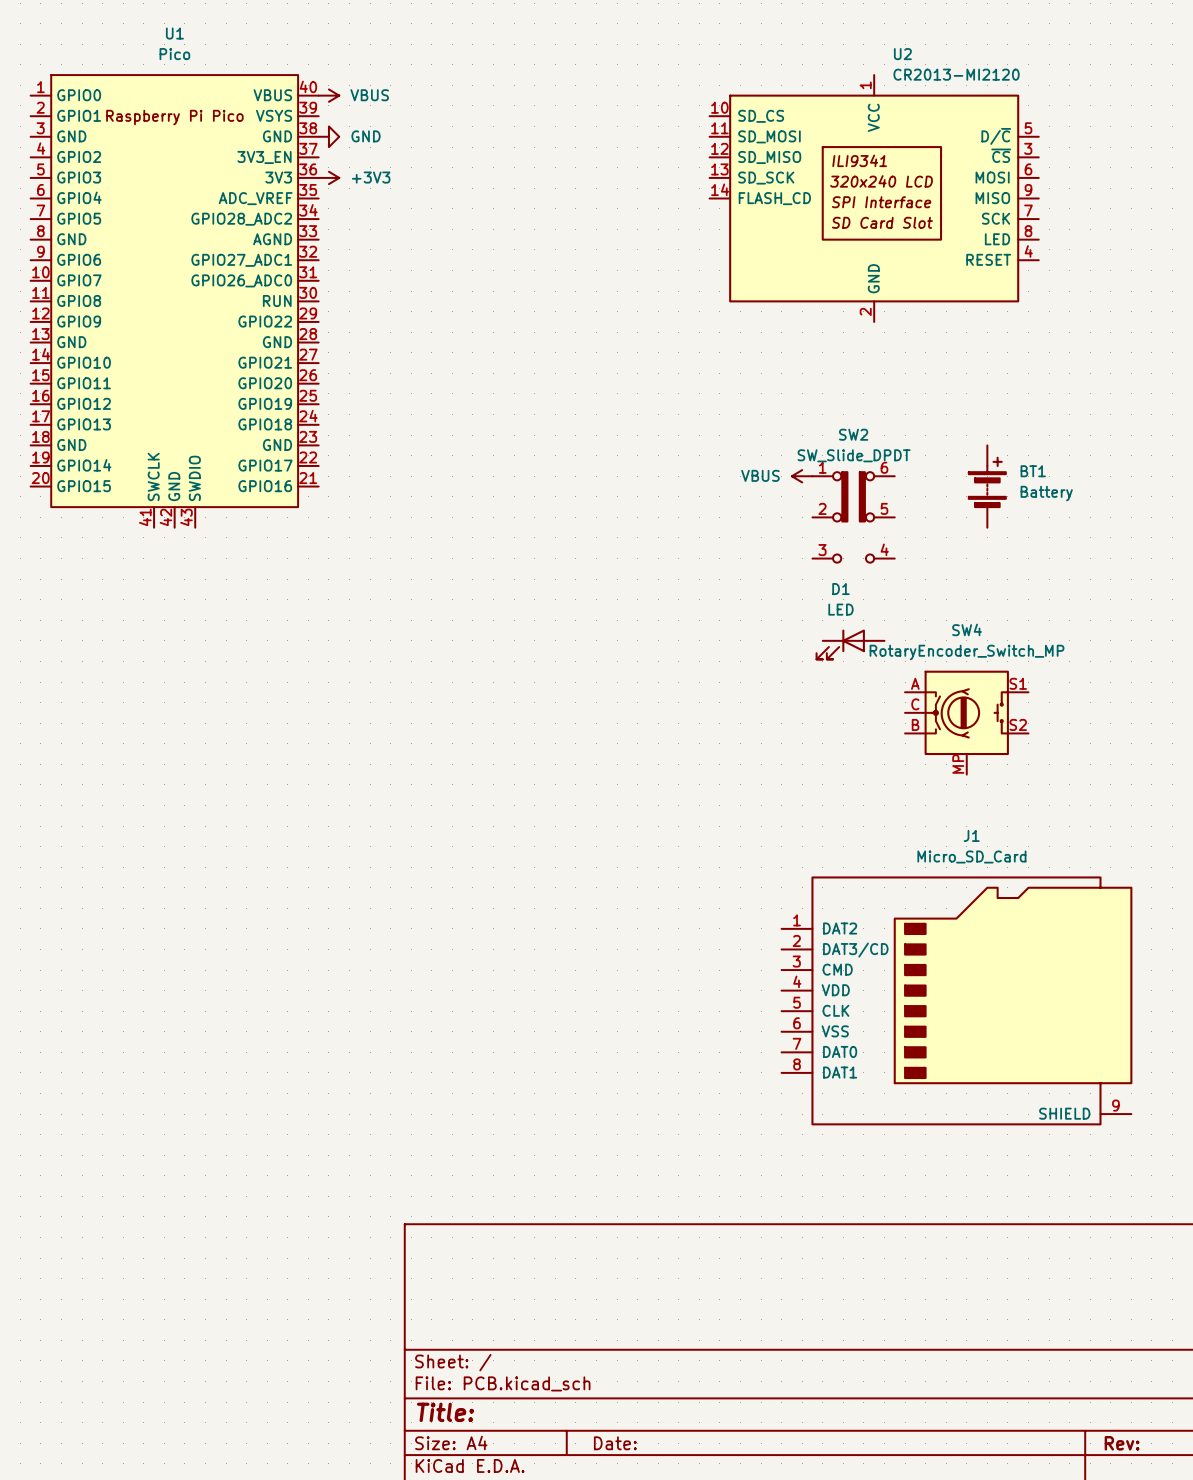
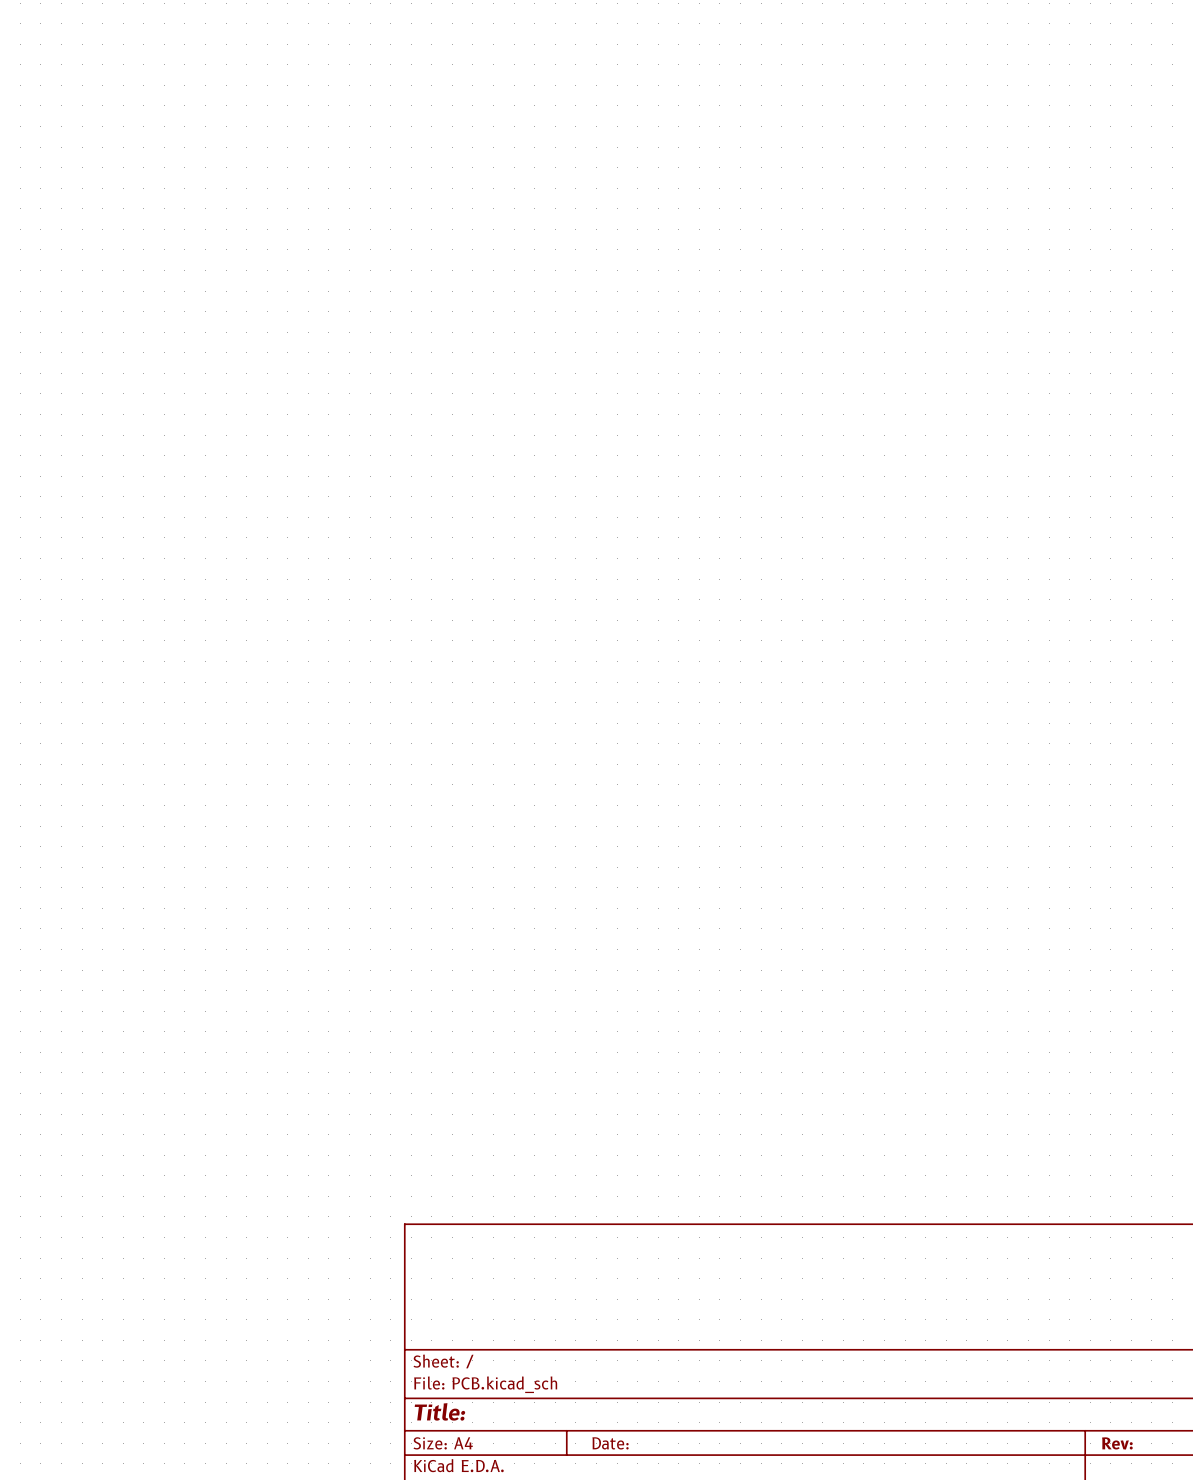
power symbol: VBUS (328, 95) -> none
power symbol: GND (328, 136) -> none
power symbol: +3V3 (328, 177) -> none
U2: CR2013-MI2120 (874, 198) -> none
U1: Pico (174, 301) -> none
power symbol: VBUS (802, 476) -> none
BT1: Battery (987, 486) -> none
SW2: SW_Slide_DPDT (853, 517) -> none
D1: LED (850, 644) -> none
SW4: RotaryEncoder_Switch_MP (966, 722) -> none
J1: Micro_SD_Card (956, 1000) -> none

